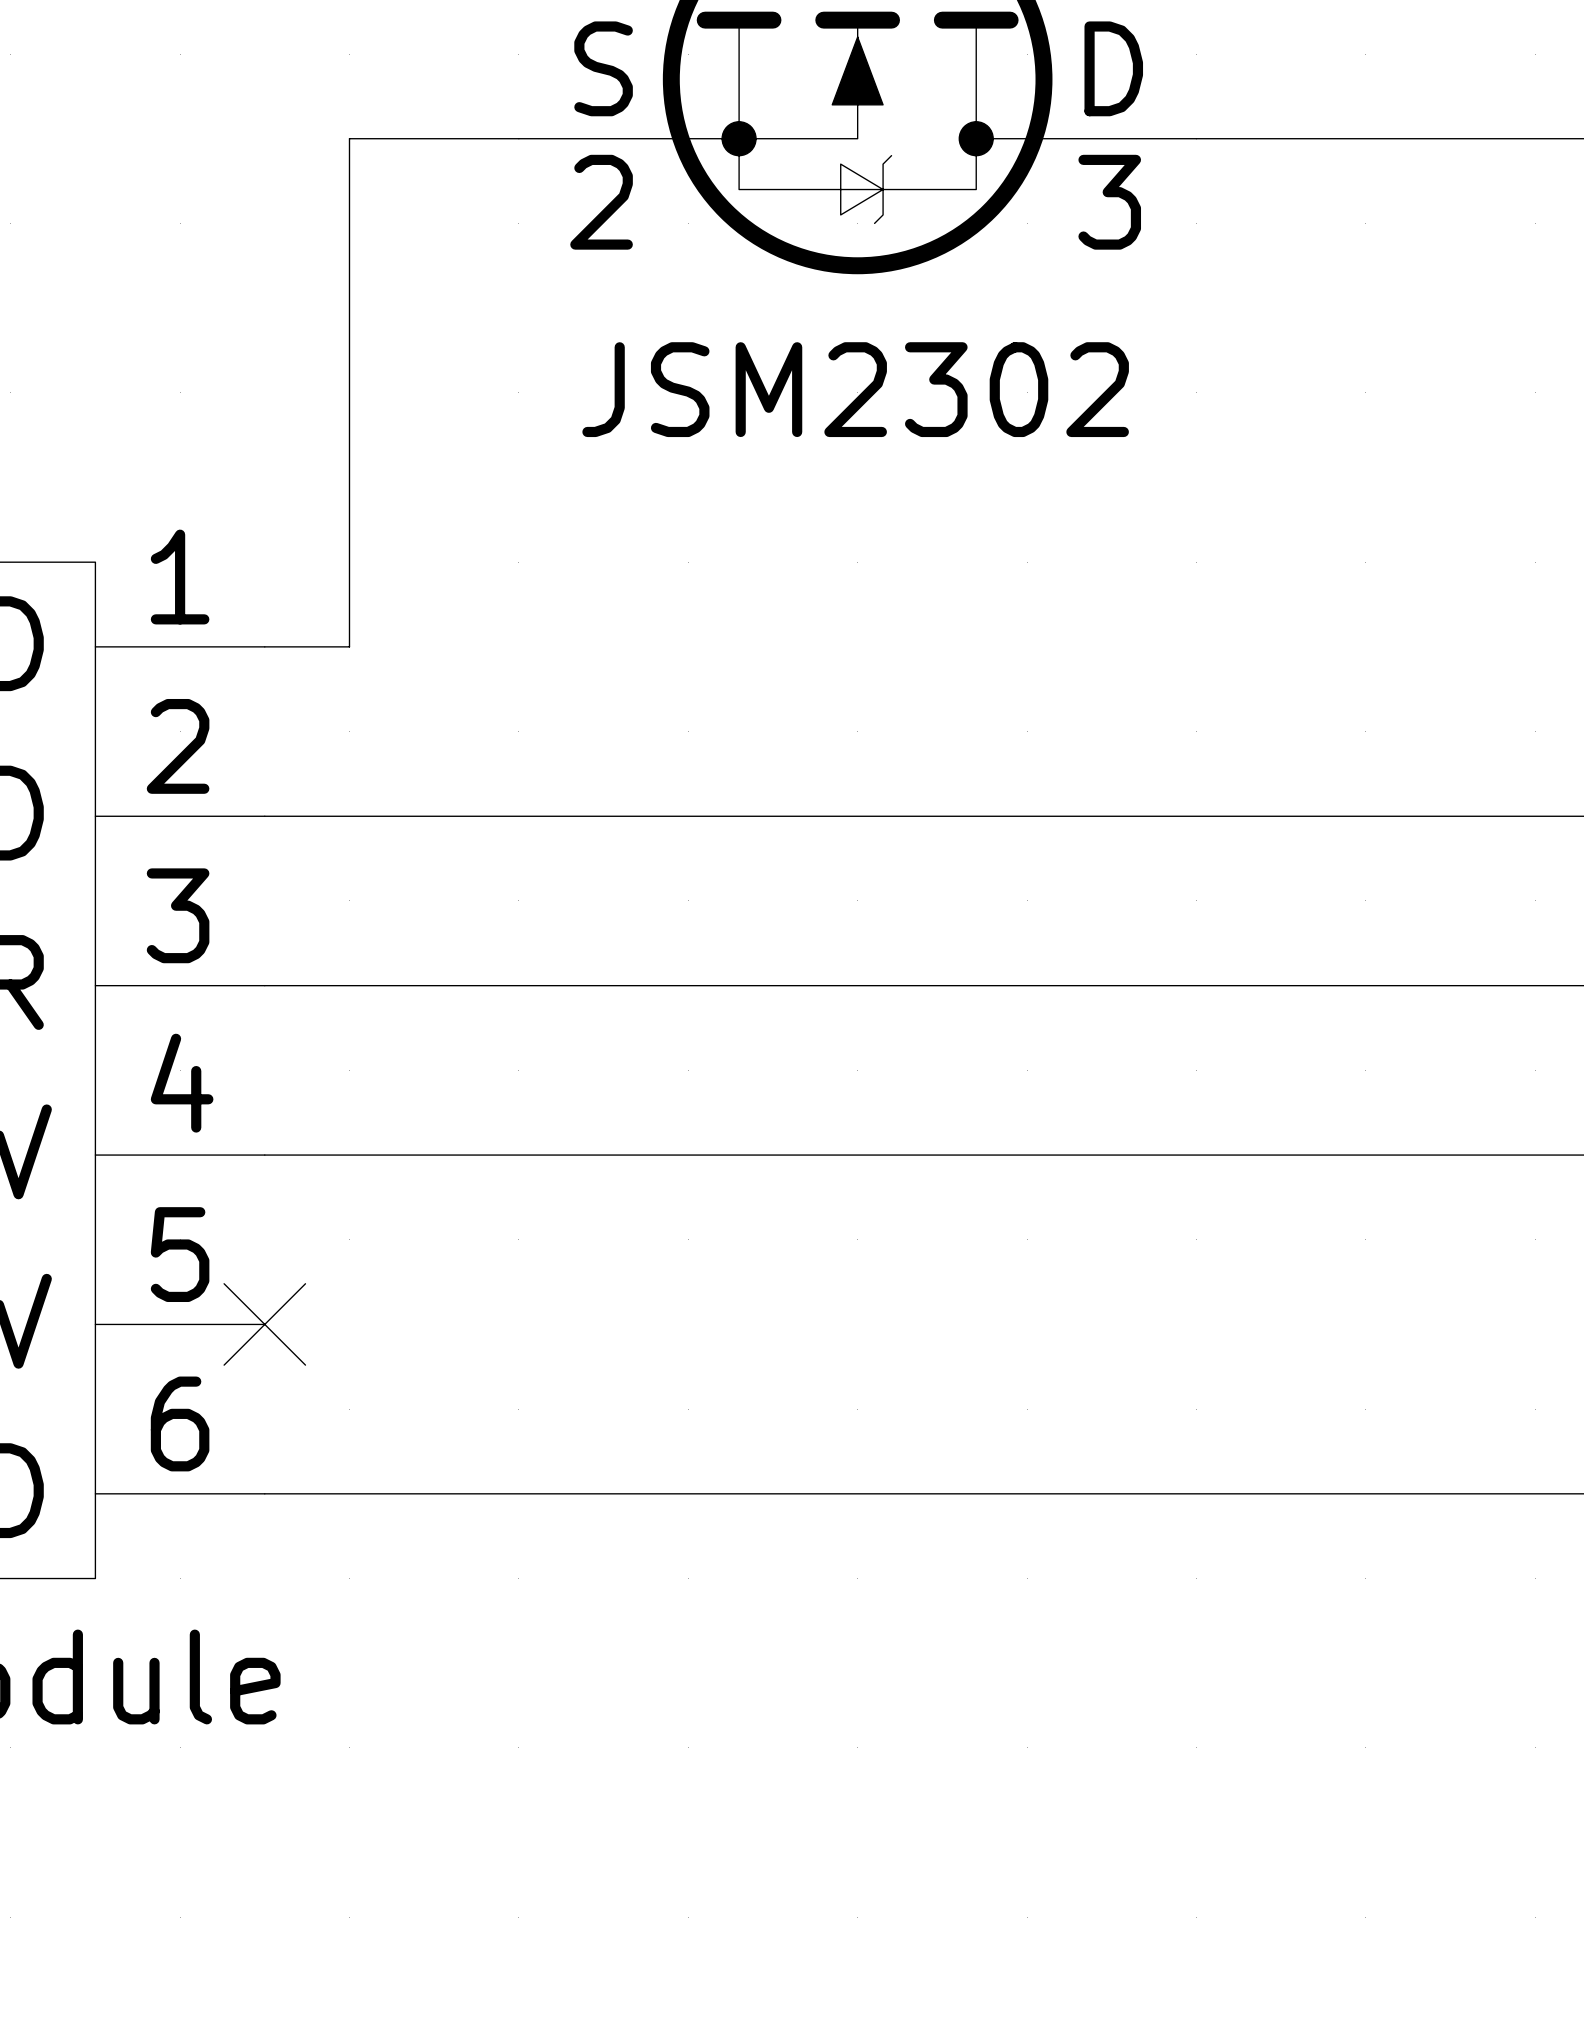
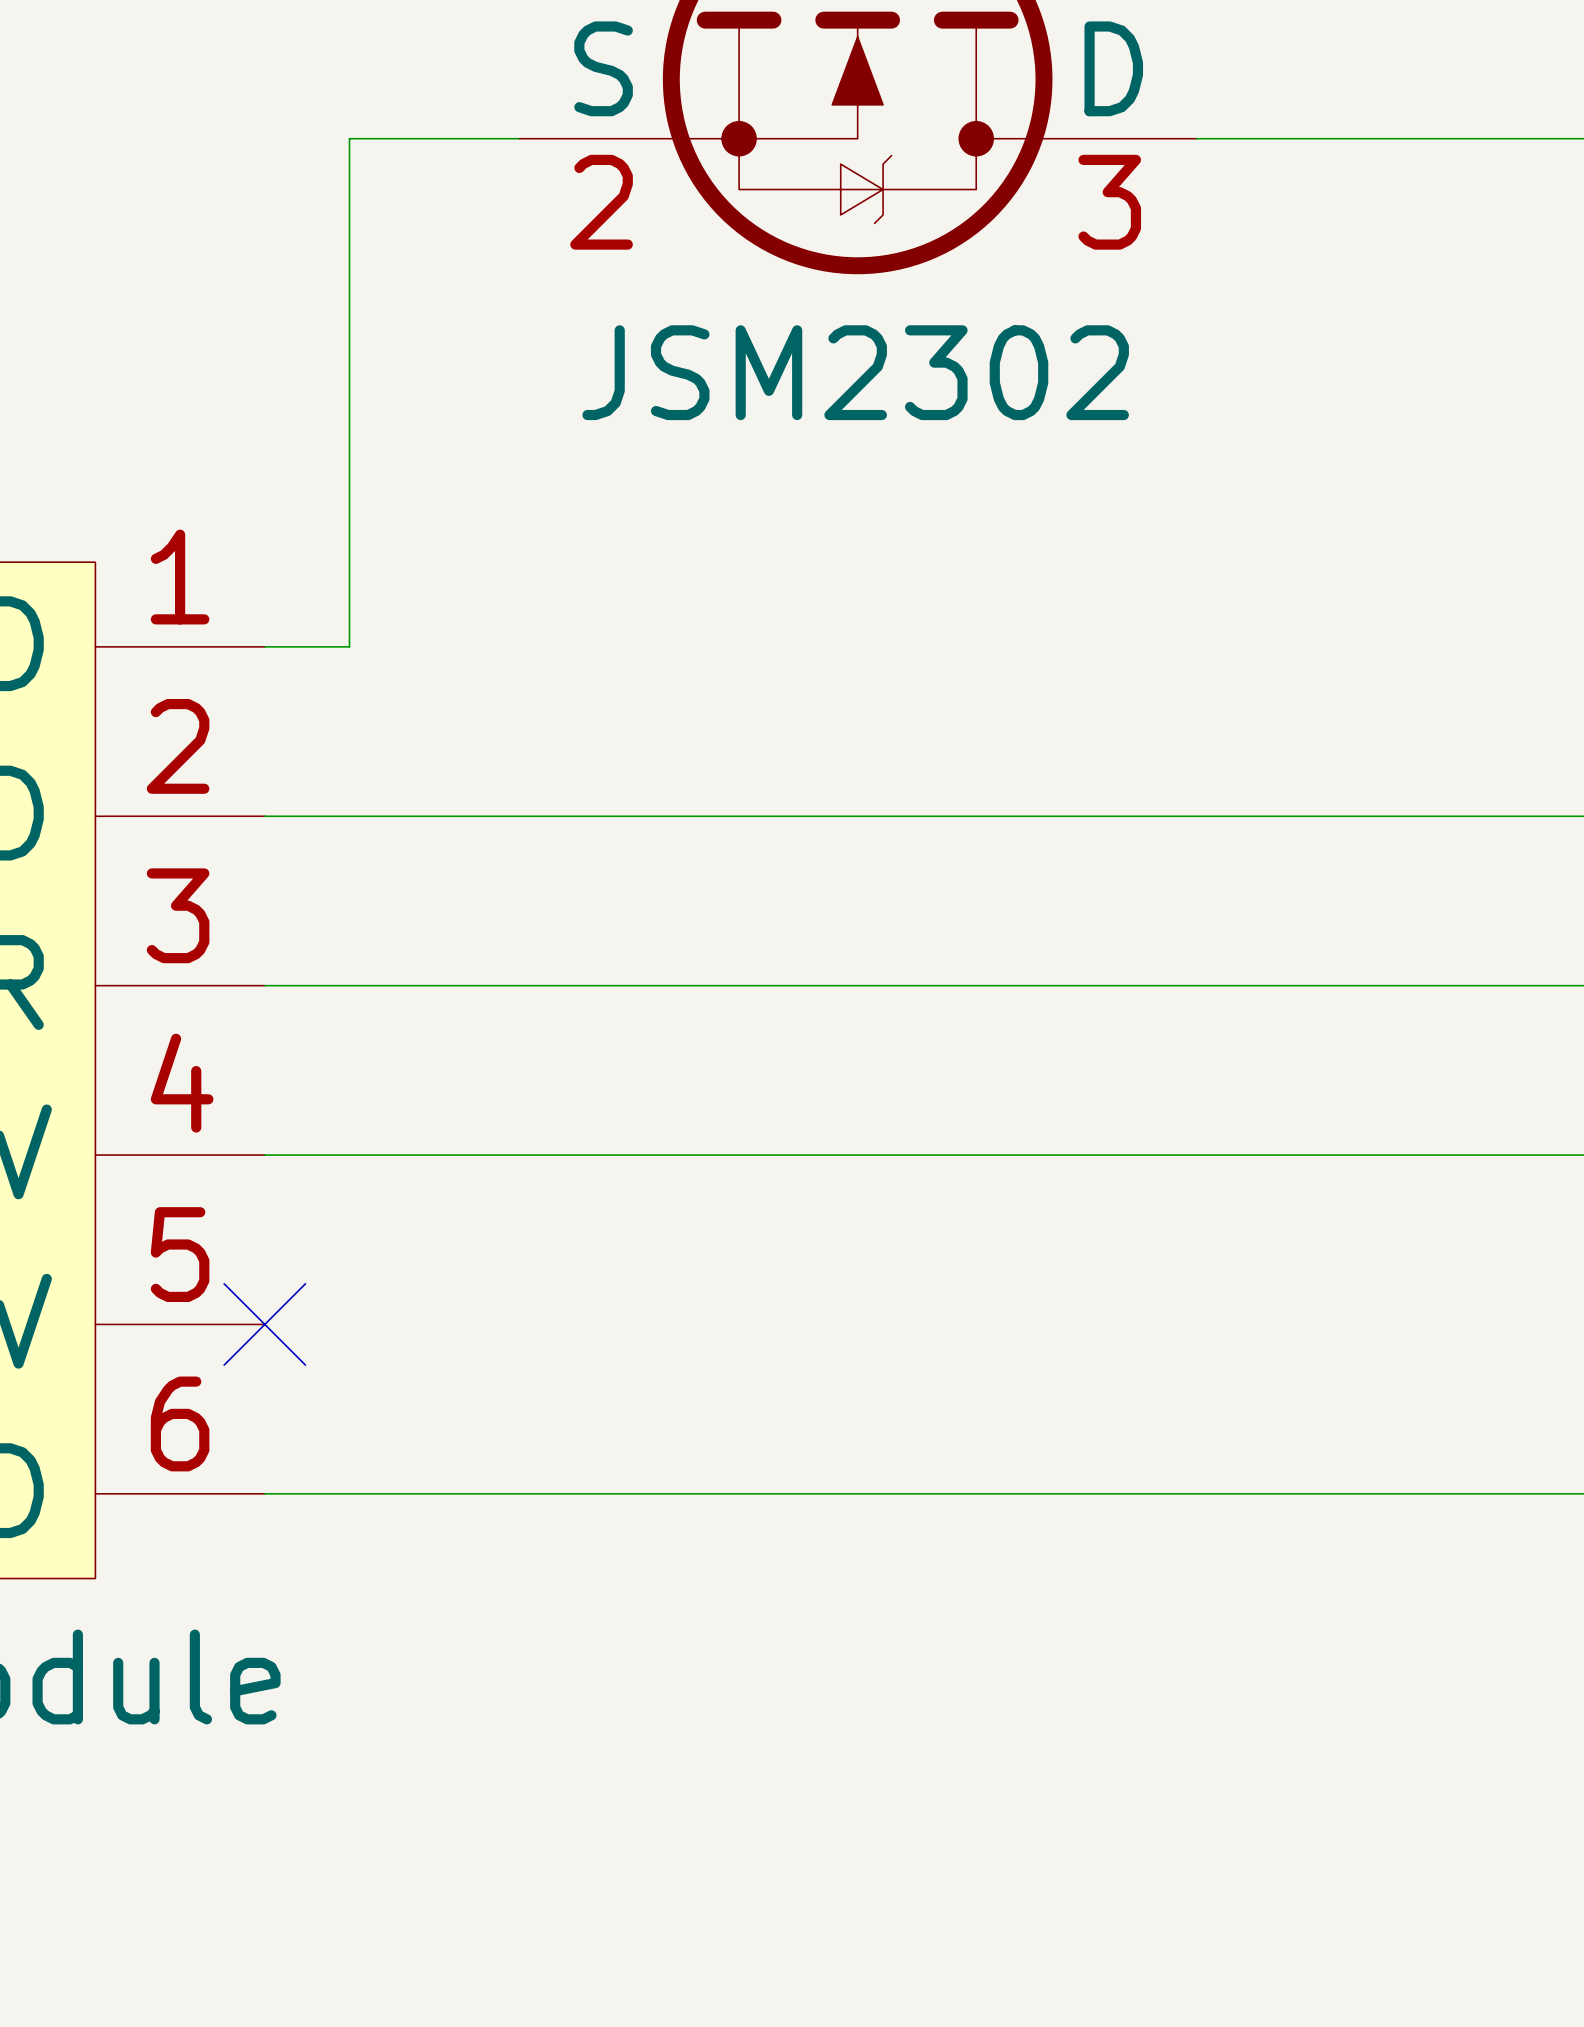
part value position: JSM2302 (855, 389) -> JSM2302 (855, 372)

